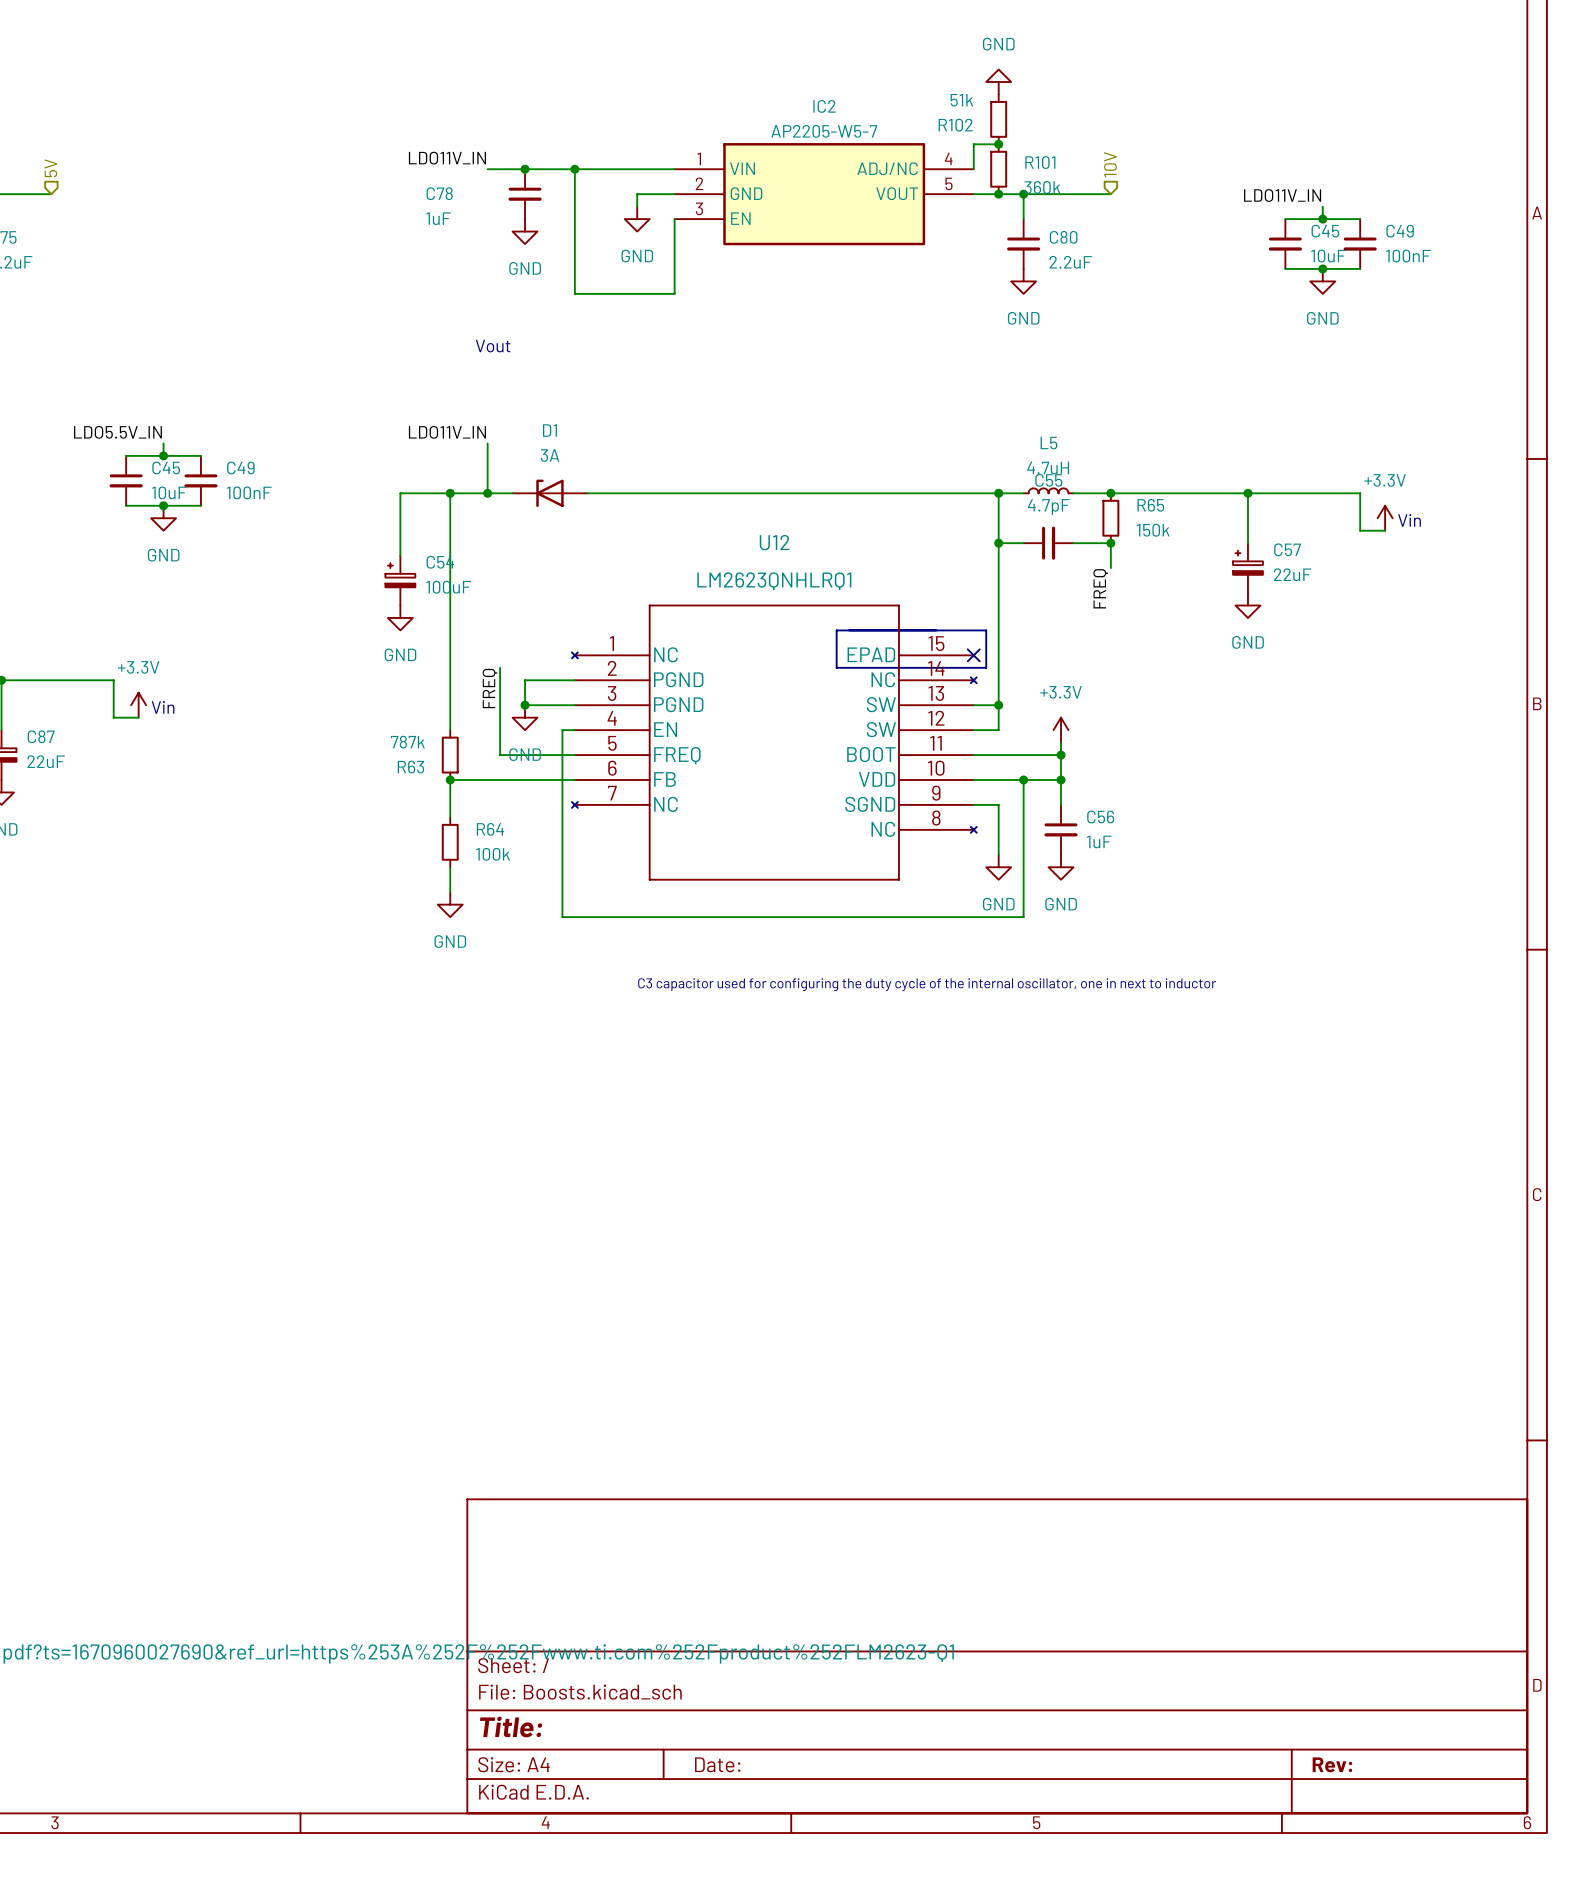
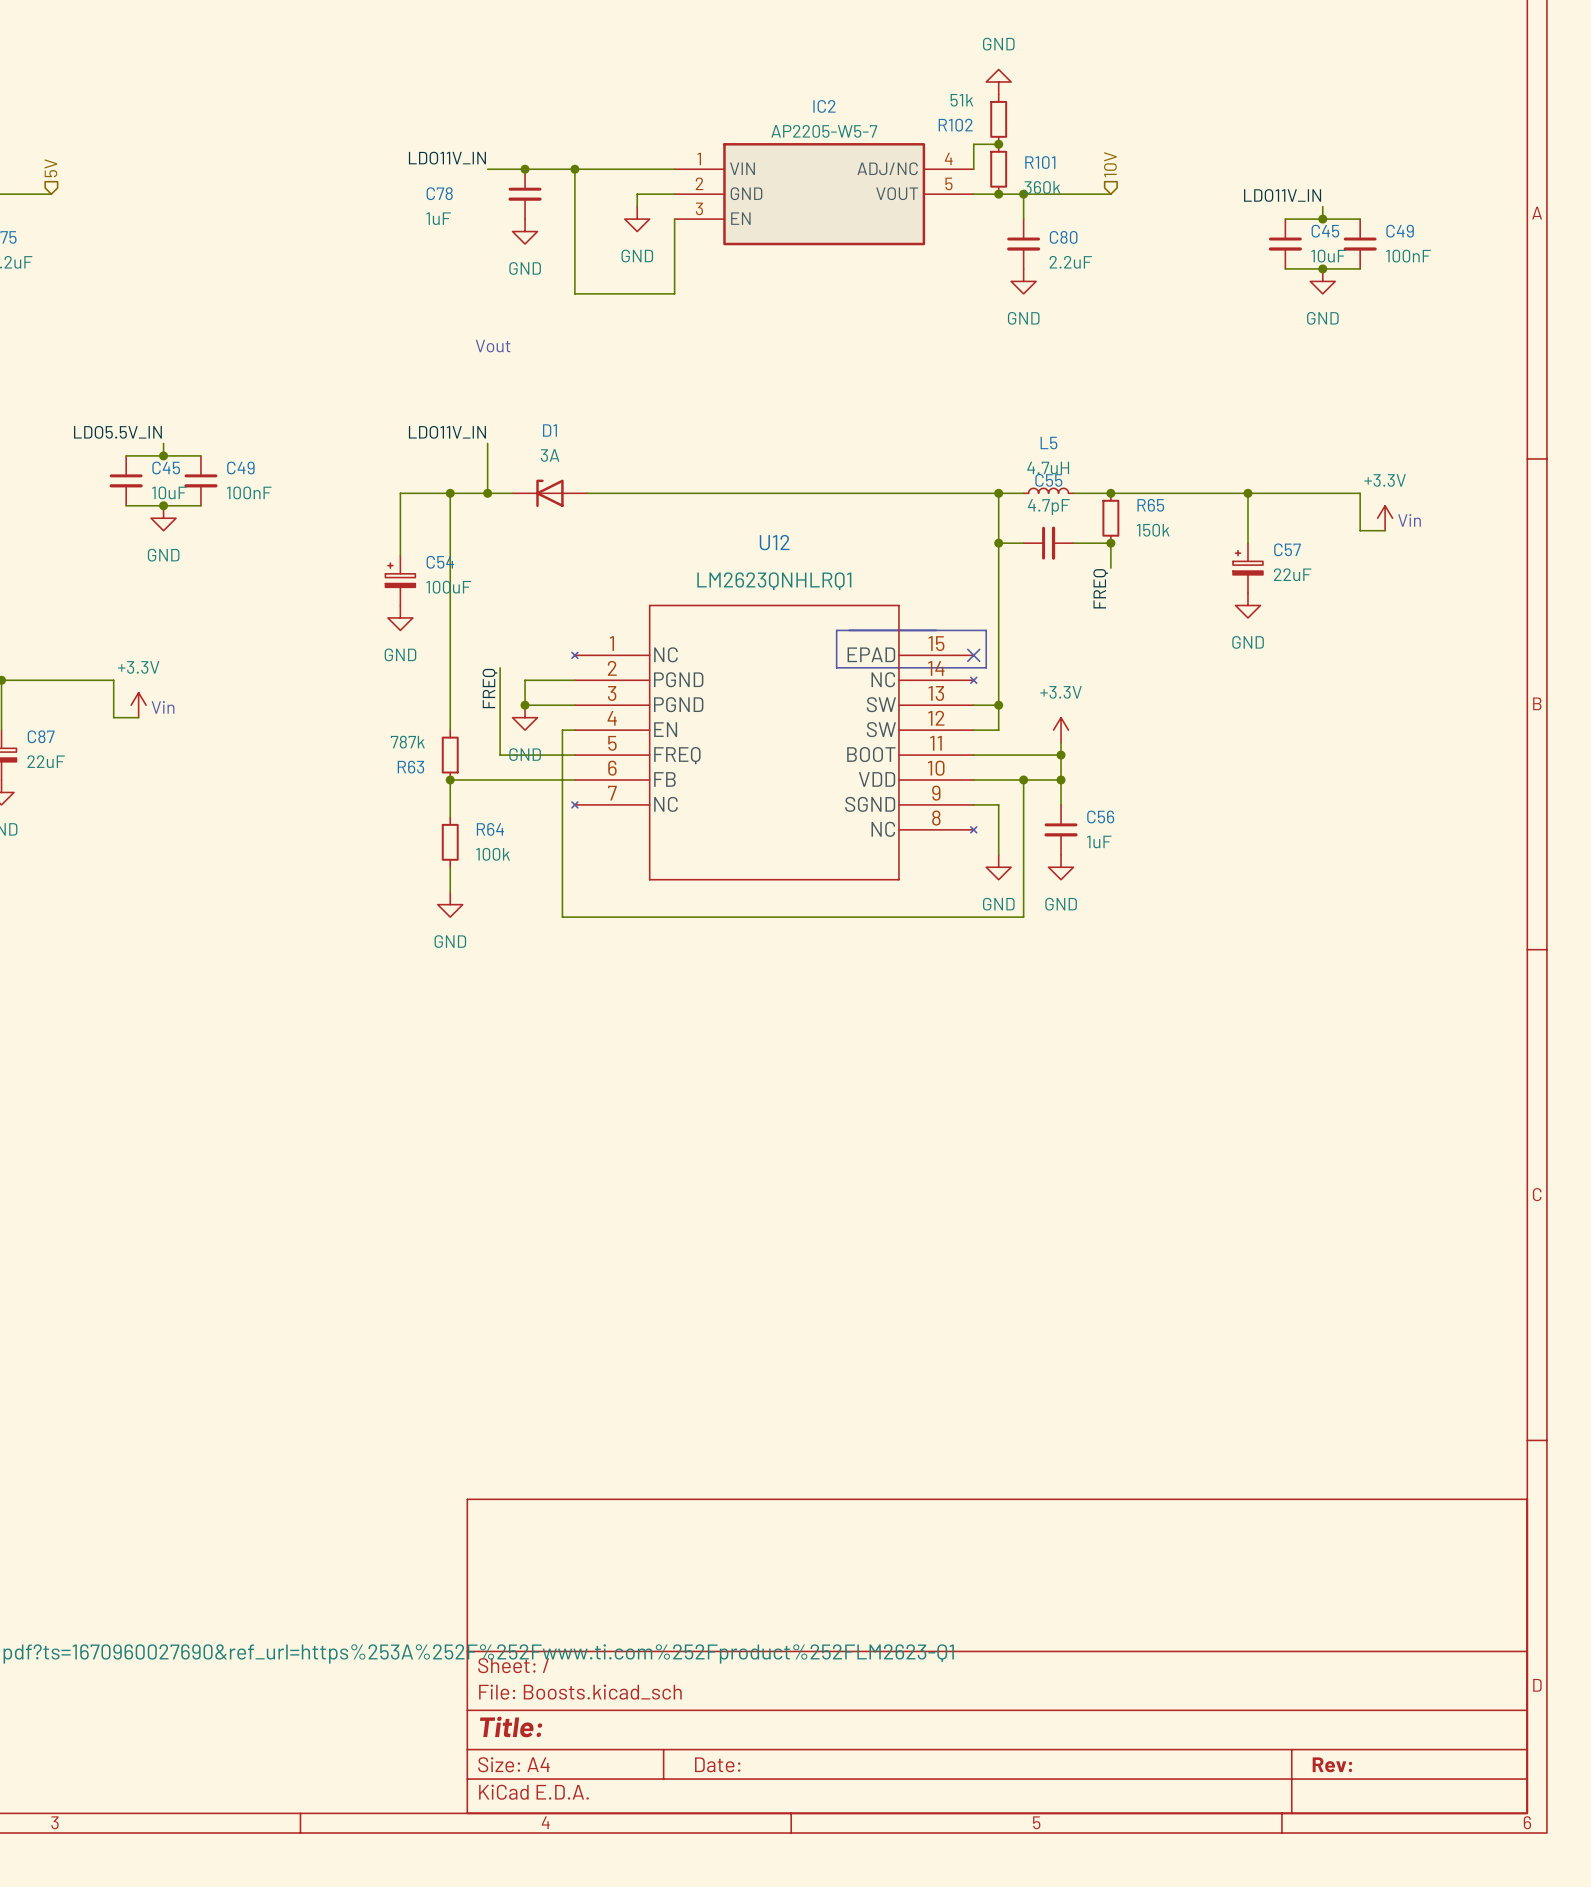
text: C3 capacitor used for configuring the duty cycle of the internal oscillator, one in next to inductor (927, 984) -> none

